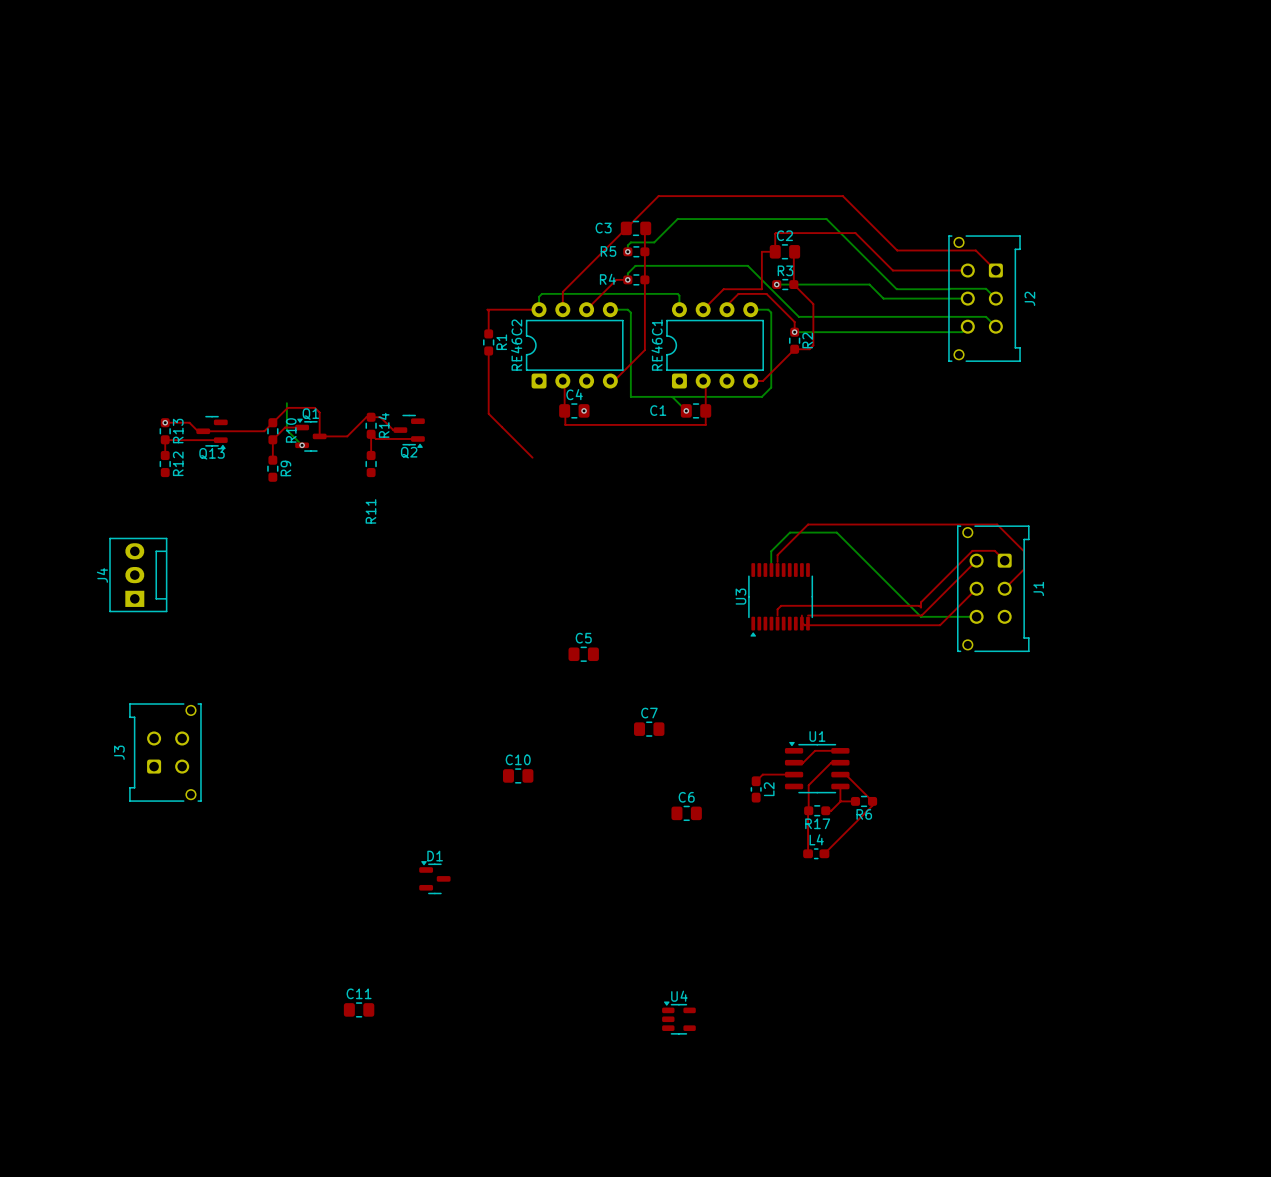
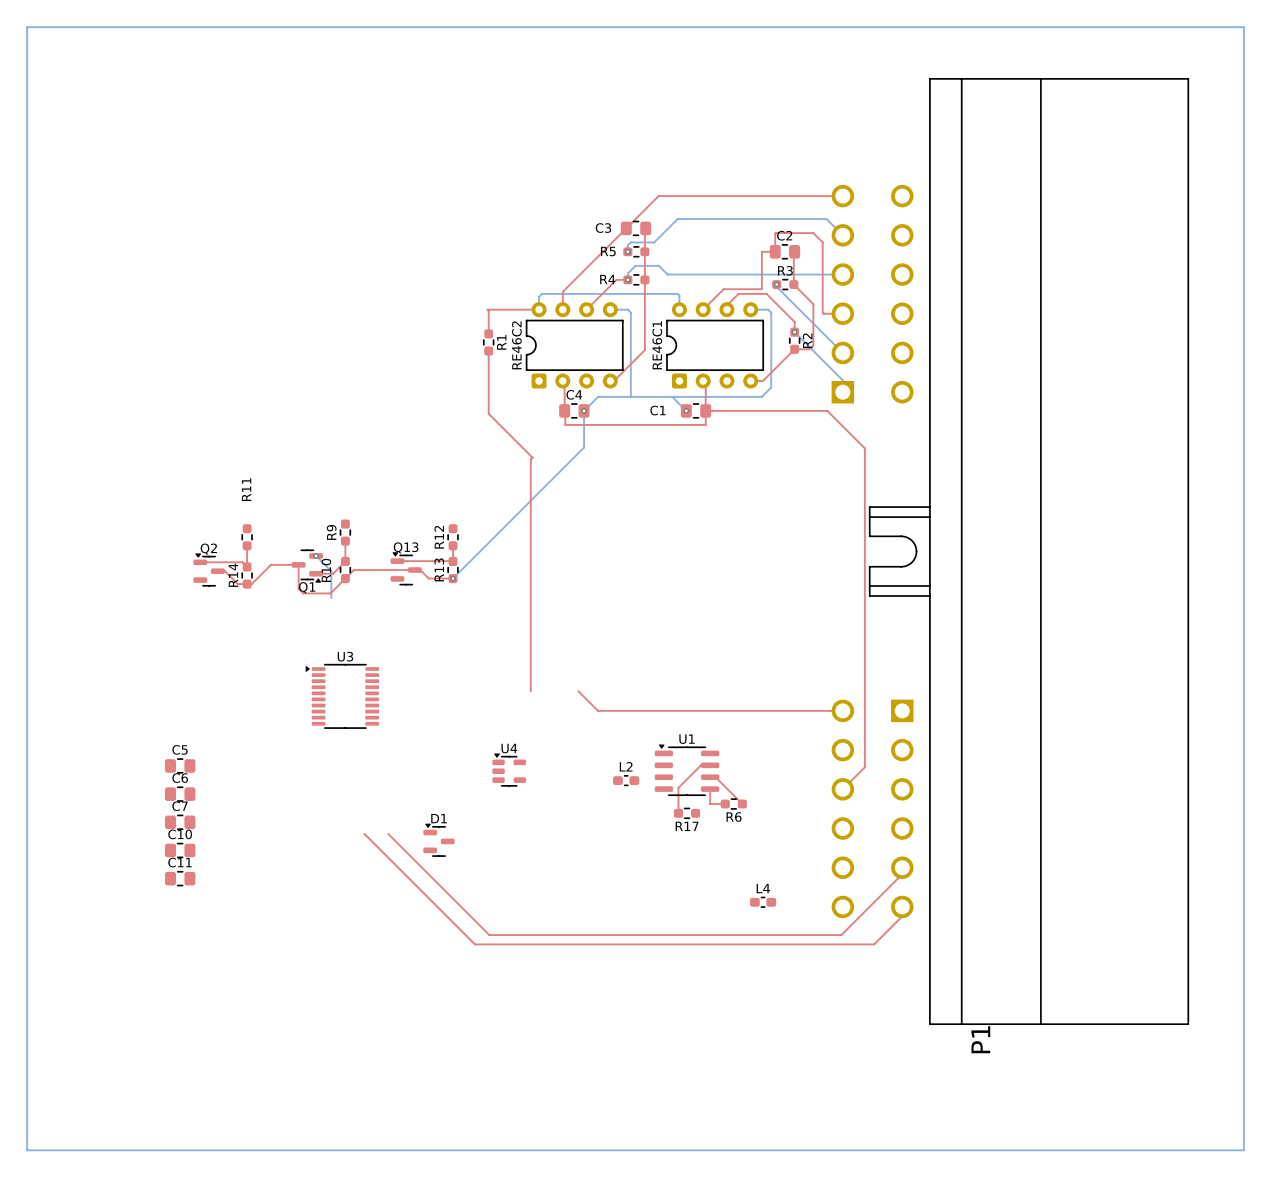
bottom track: none -> (27, 27) (1243, 27) (1243, 1150) (27, 1150) (27, 27)
top track: (842, 196) (897, 250) (975, 250) (995, 270) -> none
top track: (813, 233) (855, 233) (892, 270) (967, 270) -> (813, 233) (822, 242) (822, 312) (842, 313)
bottom track: (842, 235) (896, 289) (986, 288) (995, 298) -> none
bottom track: (658, 265) (747, 265) (798, 316) (986, 316) (995, 326) -> (658, 265) (667, 274) (842, 274)
bottom track: (776, 284) (869, 284) (883, 298) (967, 298) -> none
bottom track: none -> (776, 286) (842, 352)
J2: (984, 298) -> none
bottom track: (967, 326) (962, 332) (794, 332) -> (842, 392) (842, 380) (794, 332)
bottom track: none -> (630, 396) (598, 396) (584, 410) (584, 447) (453, 578)
bottom track: (286, 403) (286, 430) (302, 445) -> none
top track: none -> (705, 410) (827, 410) (864, 448) (864, 767) (842, 789)
top track: (165, 422) (189, 422) (197, 431) (264, 431) (287, 407) (314, 407) (319, 412) (319, 436) (347, 436) (366, 417) (380, 417) (393, 430) (400, 430) -> none
via: (165, 422) -> none
R14 position: (371, 425) -> (247, 575)
R14 name position: R14 (383, 425) -> R14 (233, 575)
top track: (302, 427) (285, 427) (272, 439) (272, 460) -> none
R10 name position: R10 (291, 430) -> R10 (326, 570)
R13 position: (165, 431) -> (453, 570)
R13 name position: R13 (178, 431) -> R13 (439, 569)
R10 position: (272, 431) -> (345, 570)
Q2 rotation: 0° (409, 431) -> 180° (209, 569)
Q2 position: (409, 431) -> (209, 569)
Q13 rotation: 0° (212, 432) -> 180° (406, 568)
Q13 position: (212, 432) -> (406, 568)
Q1 rotation: 0° (310, 435) -> 180° (307, 566)
Q1 position: (310, 435) -> (307, 566)
top track: (417, 438) (375, 438) (371, 434) (371, 455) -> none
top track: (220, 440) (165, 439) (165, 455) -> none
via: (302, 445) -> none
top track: none -> (532, 457) (530, 459) (530, 691)
R12 name position: R12 (178, 463) -> R12 (439, 537)
R12 position: (165, 464) -> (453, 537)
R11 position: (371, 464) -> (247, 537)
R9 position: (272, 468) -> (345, 532)
R9 name position: R9 (285, 468) -> R9 (331, 532)
R11 name position: R11 (370, 511) -> R11 (246, 489)
top track: none -> (345, 541) (345, 561) (333, 573) (316, 573)
top track: none -> (247, 545) (247, 566) (242, 562) (200, 562)
top track: none -> (453, 545) (453, 561) (397, 561)
P1: none -> (1010, 551)
bottom track: none -> (316, 555) (331, 571) (331, 598)
via: none -> (316, 555)
top track: (976, 560) (921, 615) (807, 615) -> none
top track: (1004, 560) (994, 550) (972, 550) (921, 602) (921, 607) (919, 605) (781, 605) (777, 609) (777, 615) -> none
top track: (777, 561) (777, 555) (808, 524) (997, 524) (1023, 551) (1023, 569) (1004, 588) -> none
bottom track: (771, 570) (771, 551) (789, 532) (836, 532) (921, 616) (976, 616) -> none
top track: none -> (217, 571) (224, 571) (237, 584) (251, 584) (270, 564) (298, 564) (298, 588) (303, 593) (330, 593) (353, 570) (420, 570) (428, 578) (453, 578)
J4: (138, 574) -> none
via: none -> (453, 578)
top track: (976, 588) (940, 625) (804, 625) (801, 622) (801, 615) -> none
J1: (993, 588) -> none
U3 rotation: 0° (780, 599) -> 90° clockwise (342, 696)
U3 position: (780, 599) -> (342, 696)
C5 position: (583, 654) -> (180, 765)
top track: none -> (578, 691) (598, 710) (842, 710)
C7 position: (649, 729) -> (180, 822)
top track: (840, 750) (815, 750) (803, 762) (794, 762) -> none
J3: (165, 752) -> none
top track: (840, 762) (831, 762) (808, 785) (808, 853) -> none
top track: none -> (710, 765) (701, 765) (678, 787) (678, 813)
U1 position: (817, 767) -> (687, 770)
top track: (794, 774) (762, 774) (756, 781) -> none
top track: (840, 774) (845, 774) (872, 801) (872, 805) (824, 853) -> none
C10 position: (518, 775) -> (180, 850)
top track: none -> (710, 777) (715, 777) (742, 804)
top track: (840, 786) (840, 801) -> none
top track: none -> (710, 789) (710, 804) (725, 804)
L2 rotation: 0° (756, 789) -> 90° clockwise (626, 780)
L2 position: (756, 789) -> (626, 780)
L2 name position: L2 (769, 789) -> L2 (626, 766)
top track: (840, 801) (831, 810) (825, 810) -> none
top track: (840, 801) (855, 801) -> none
R6 position: (864, 801) -> (733, 804)
R17 position: (817, 810) -> (687, 813)
C6 position: (686, 813) -> (180, 794)
top track: none -> (364, 833) (474, 944) (874, 944) (902, 916) (902, 906) (906, 911)
top track: none -> (388, 833) (489, 935) (841, 935) (906, 869) (902, 867)
L4 position: (816, 853) -> (763, 902)
D1 position: (434, 877) -> (438, 840)
C11 position: (359, 1009) -> (180, 878)
U4 position: (678, 1017) -> (509, 769)

